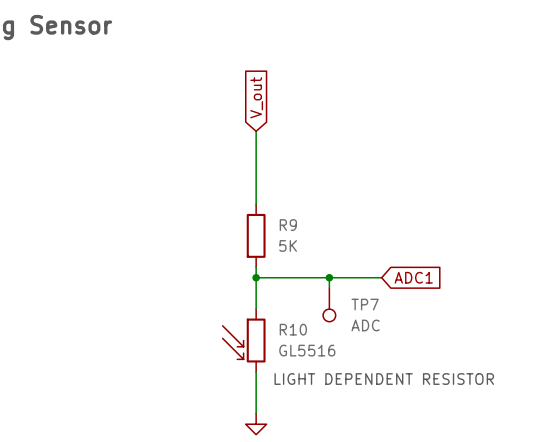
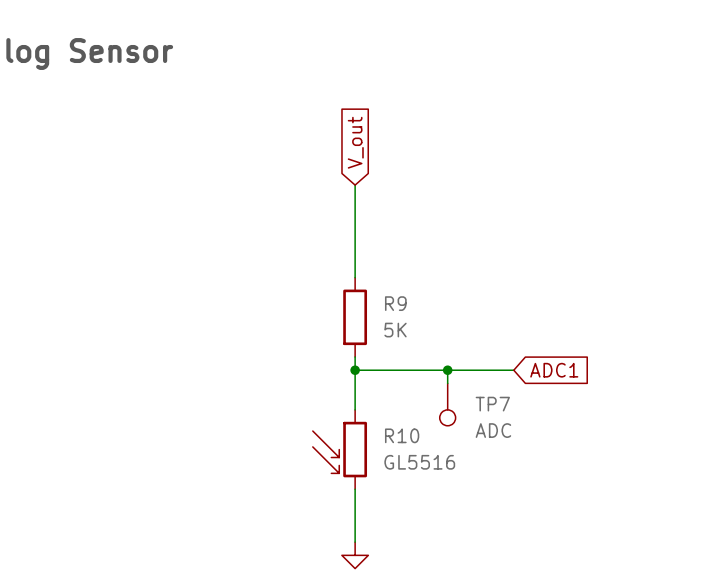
text: LIGHT DEPENDENT RESISTOR (384, 379) -> none

